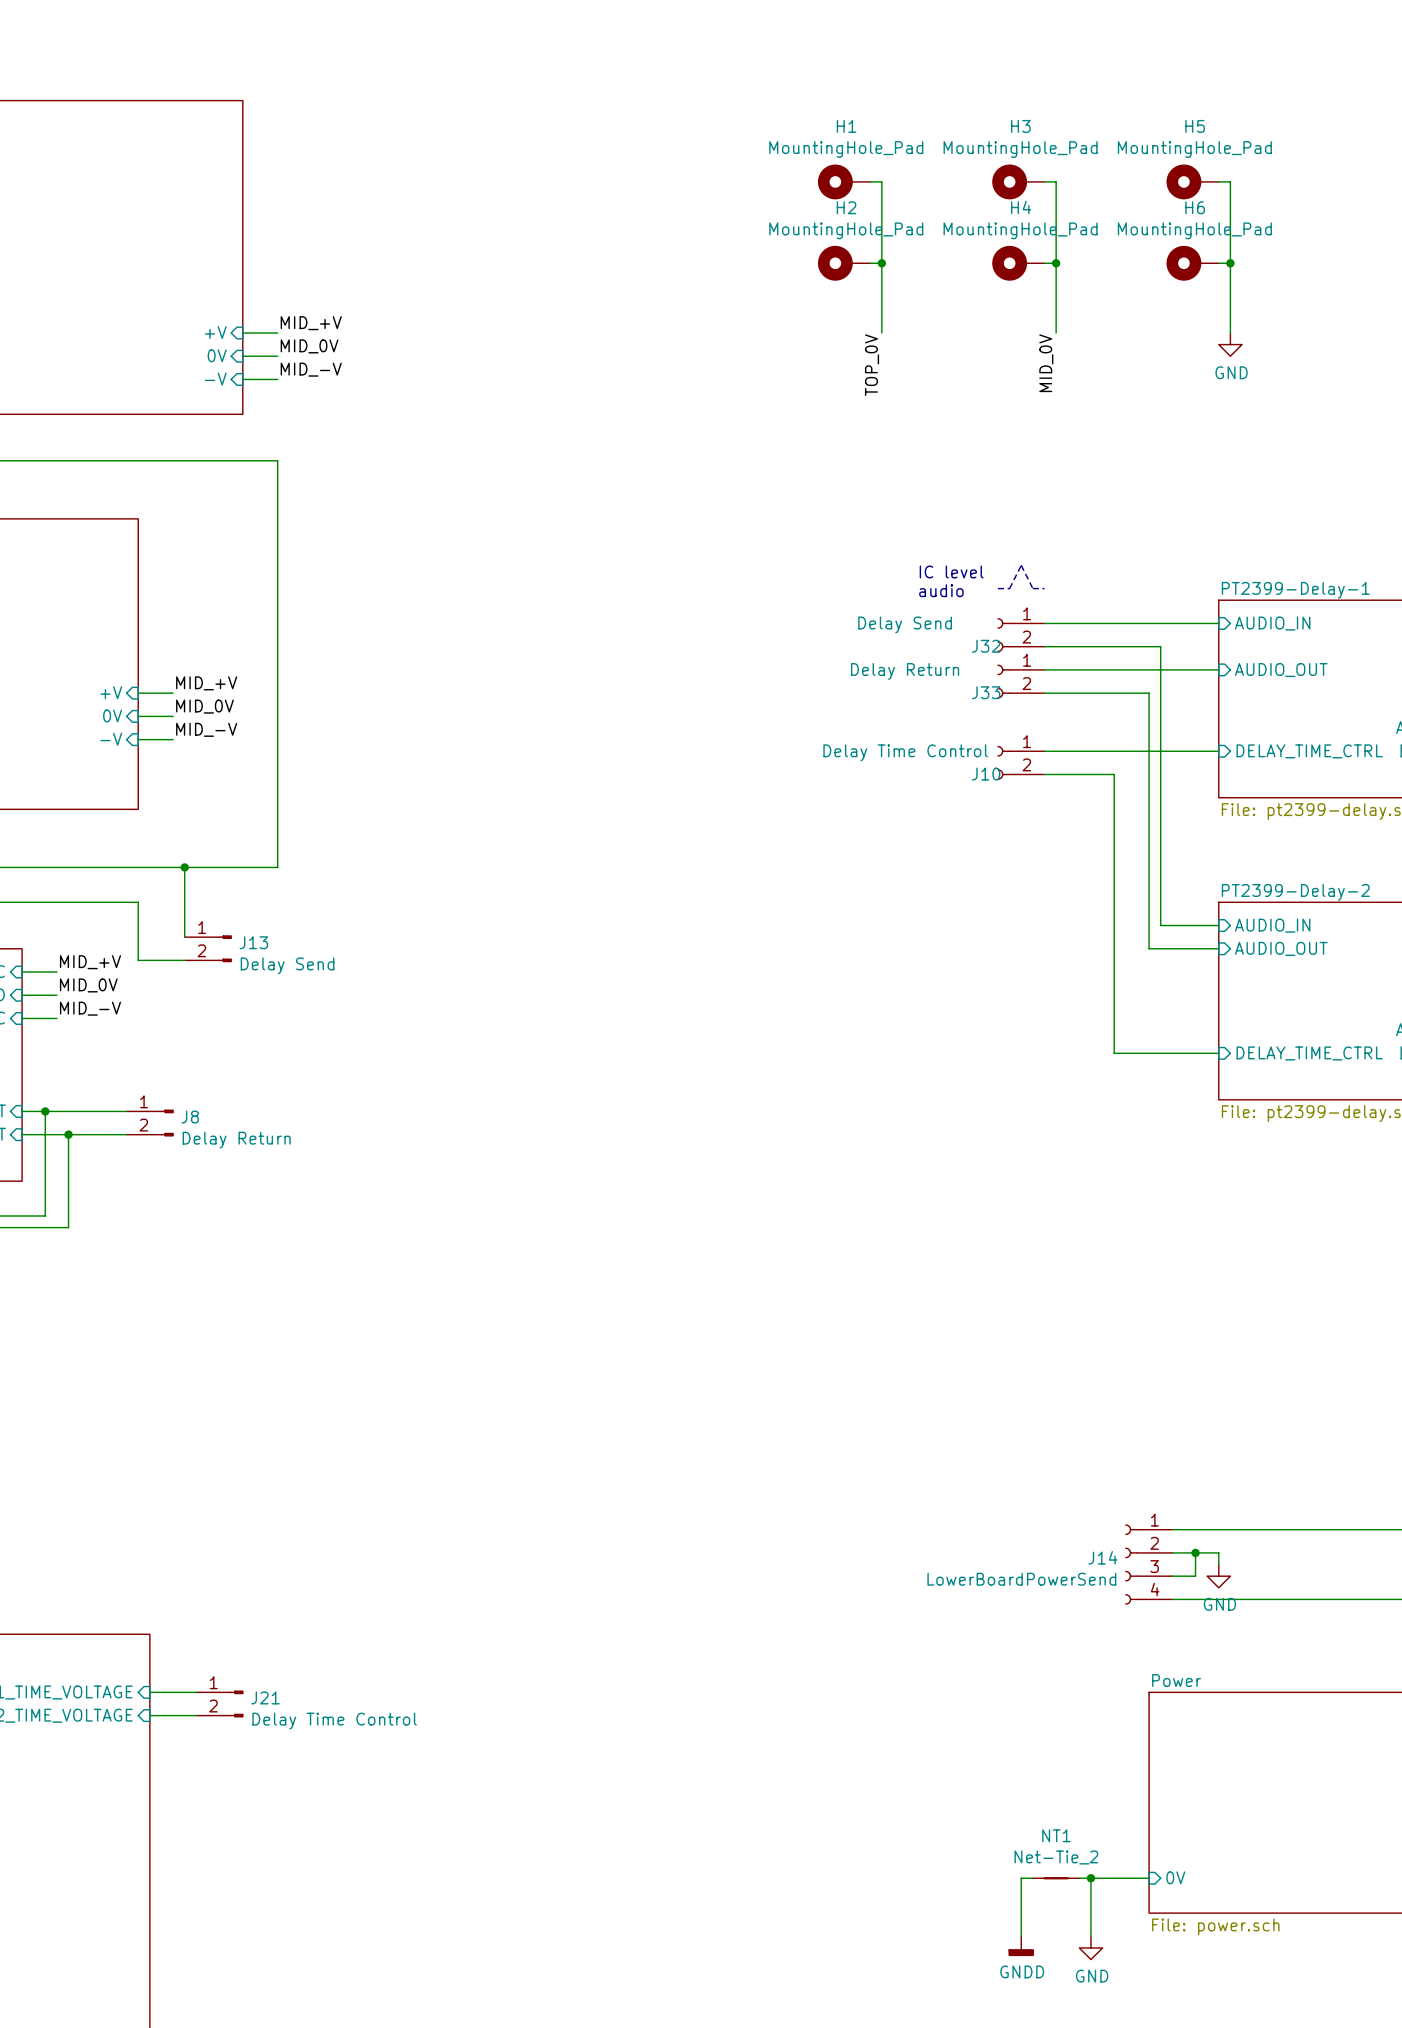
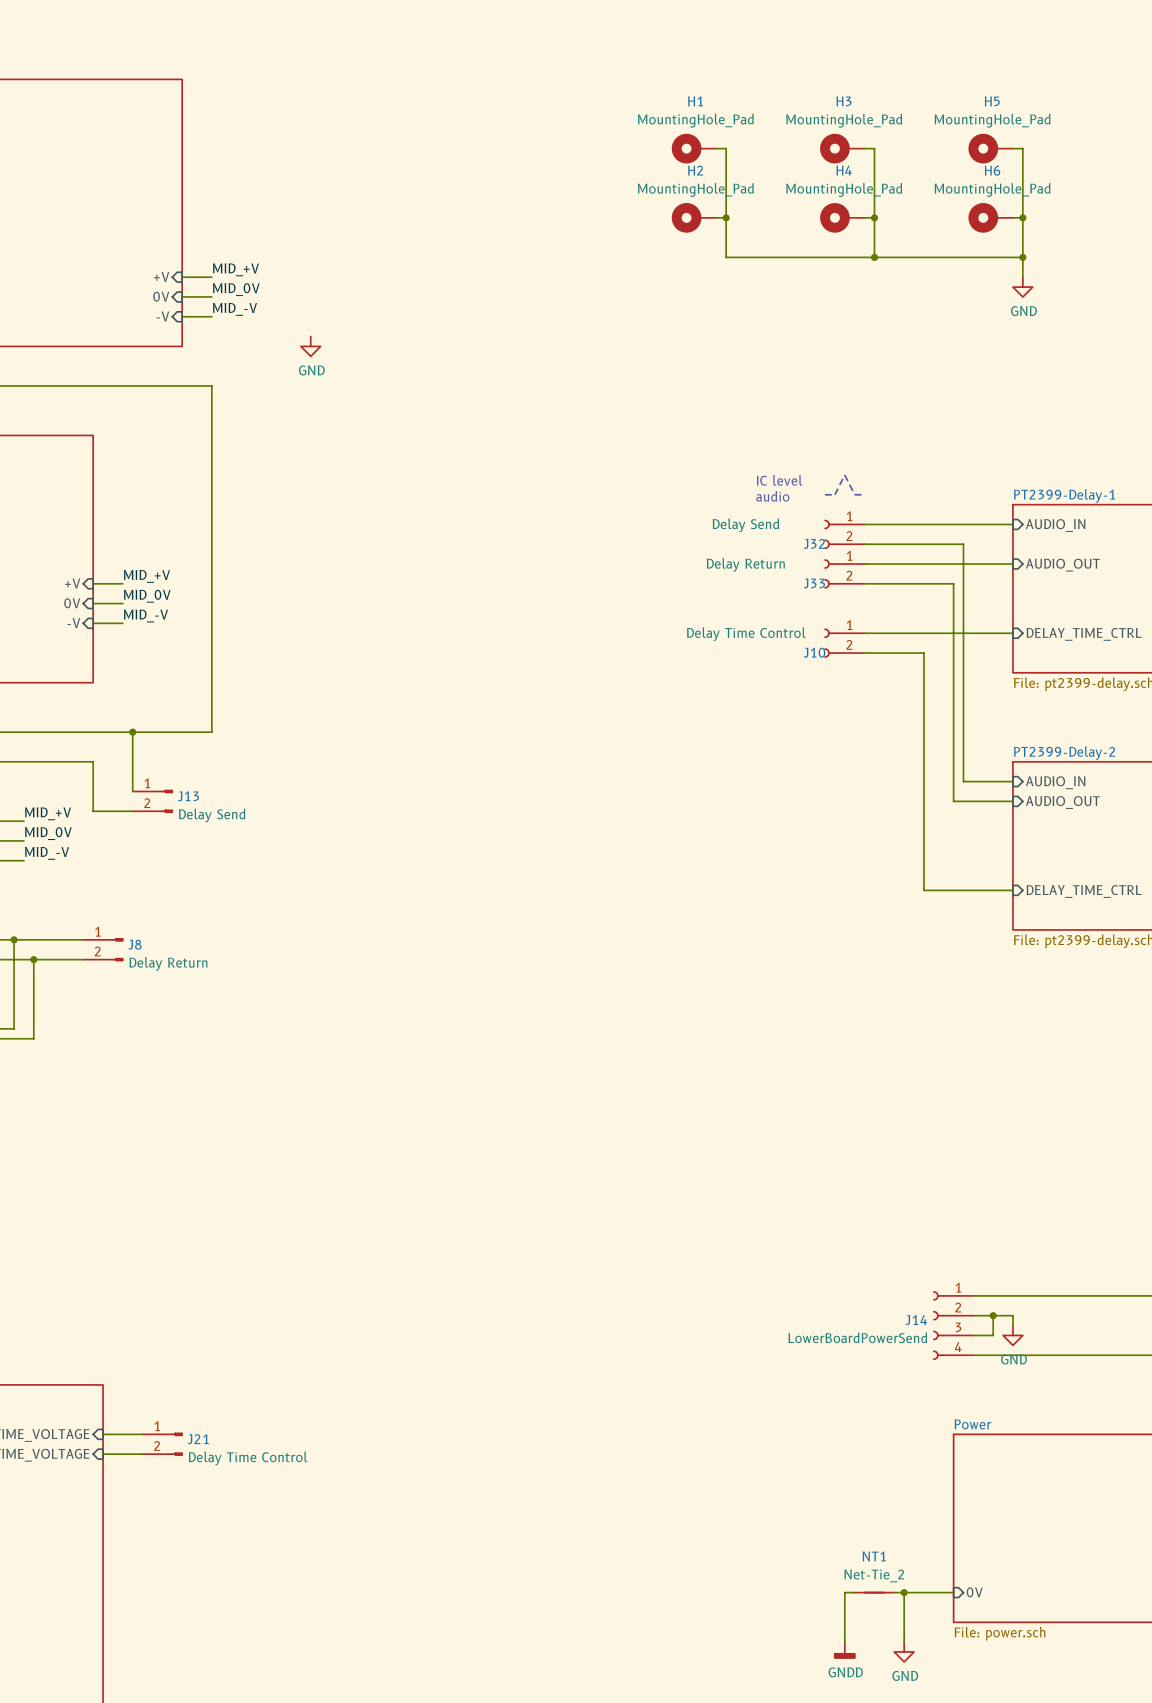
wire: (881, 309) (881, 332) -> (726, 257) (1022, 257)
wire: (1056, 309) (1056, 332) -> none
junction: none -> (874, 257)
junction: none -> (1022, 257)
label: MID_0V (1046, 363) -> none
label: TOP_0V (872, 365) -> none
power symbol: none -> GND (310, 346)

